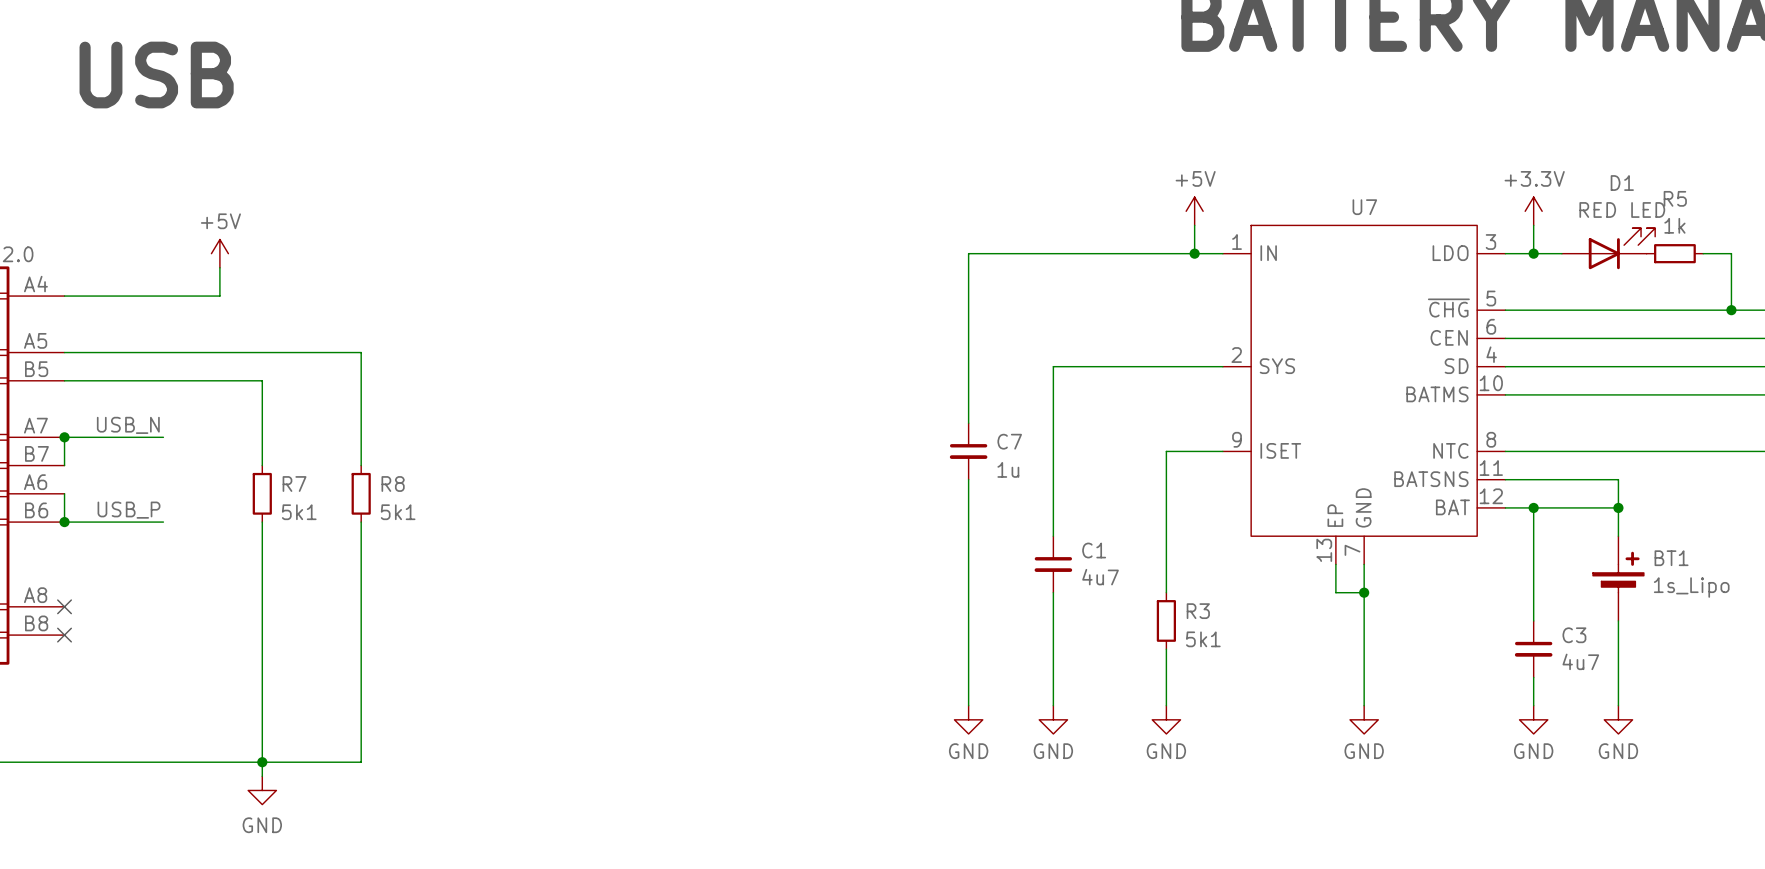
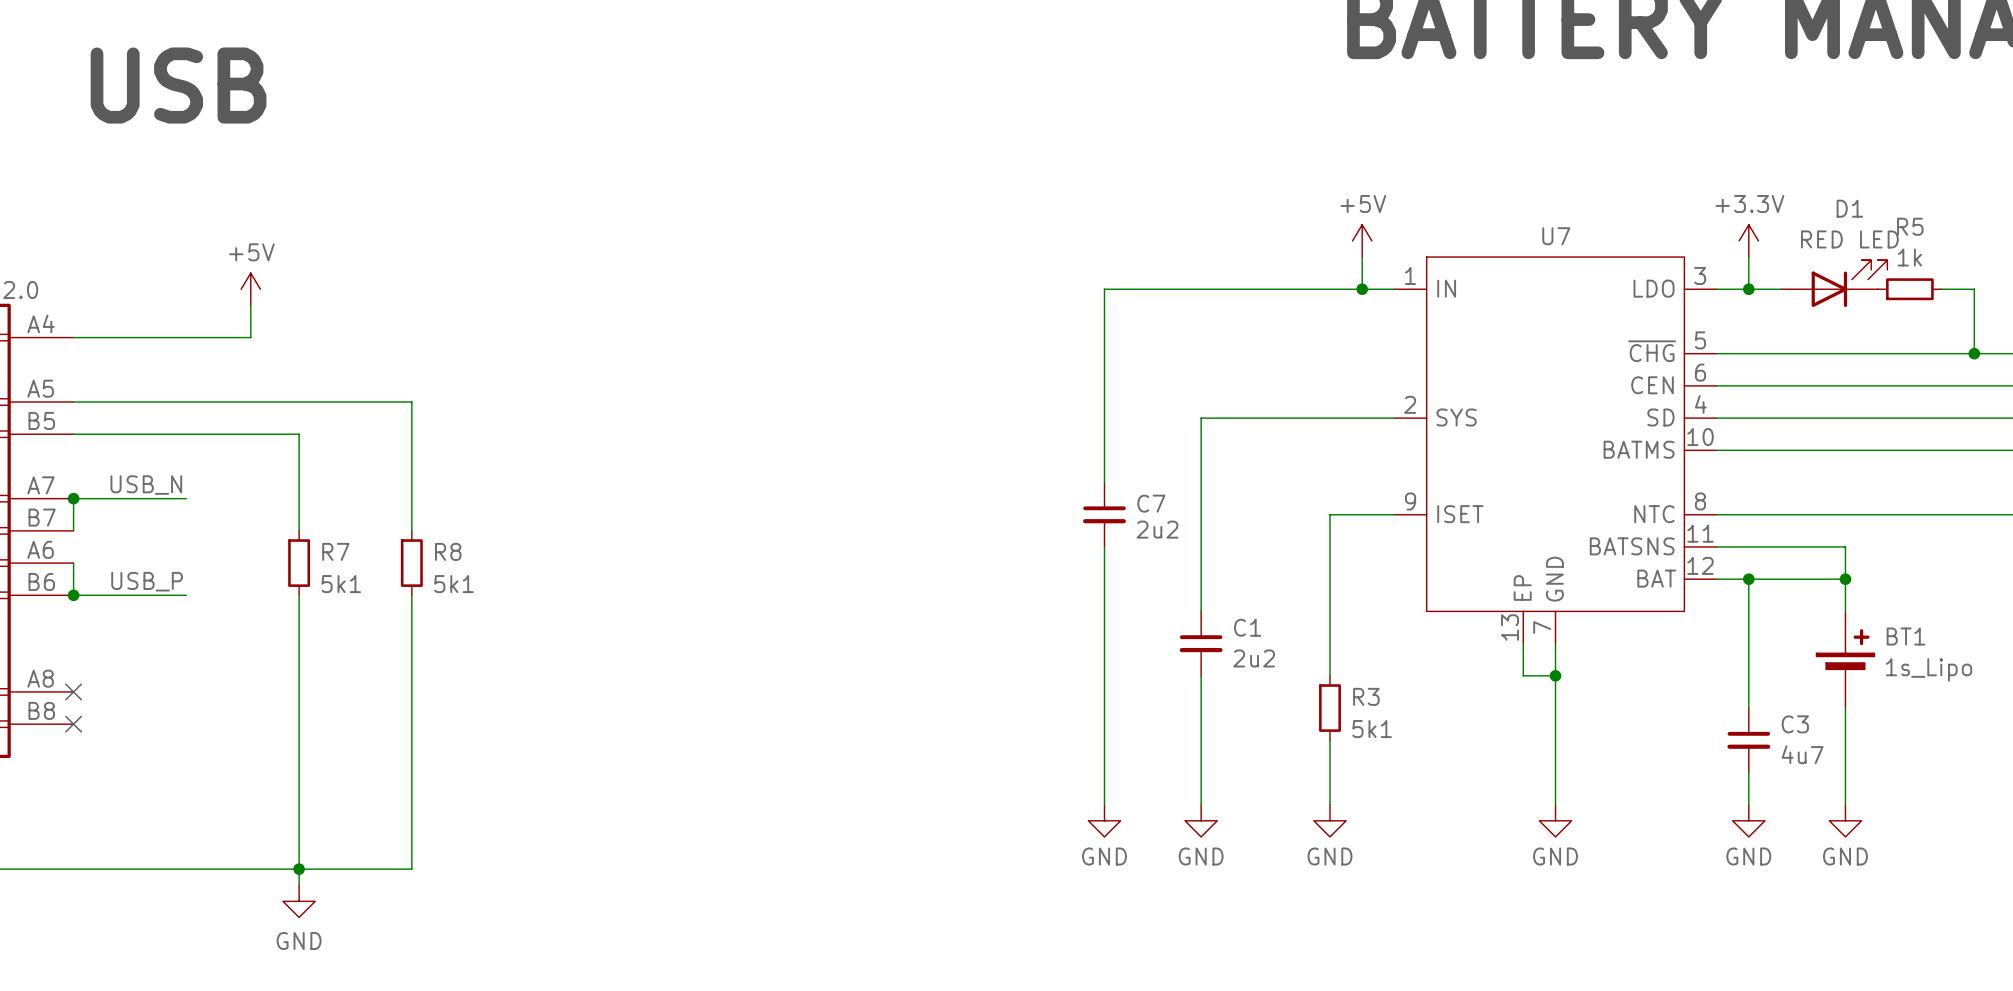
C7 value: 1u (1008, 469) -> 2u2 (1157, 529)
C1 value: 4u7 (1100, 577) -> 2u2 (1254, 658)

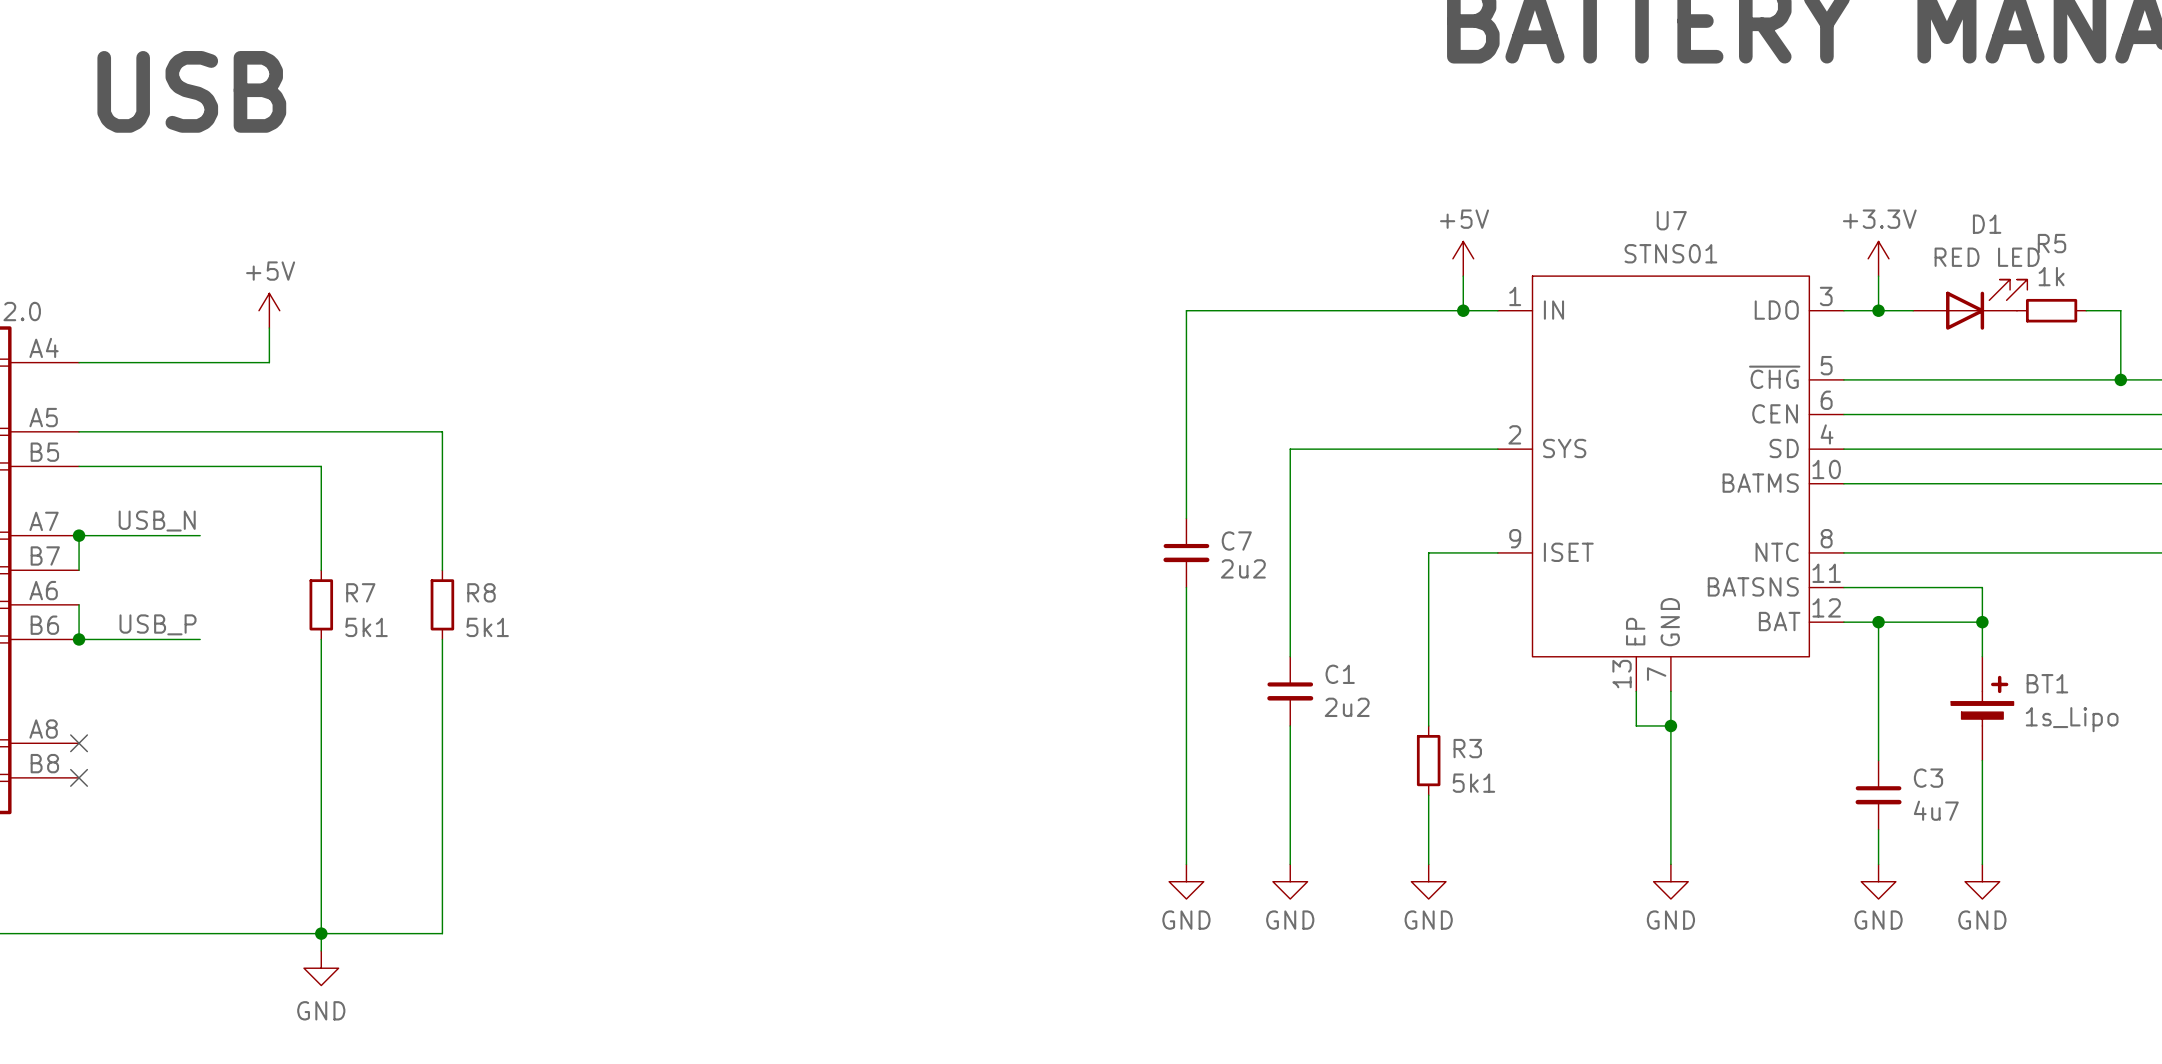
U7 value: none -> STNS01 (1670, 253)
U7 name position: U7 (1556, 236) -> U7 (1671, 220)

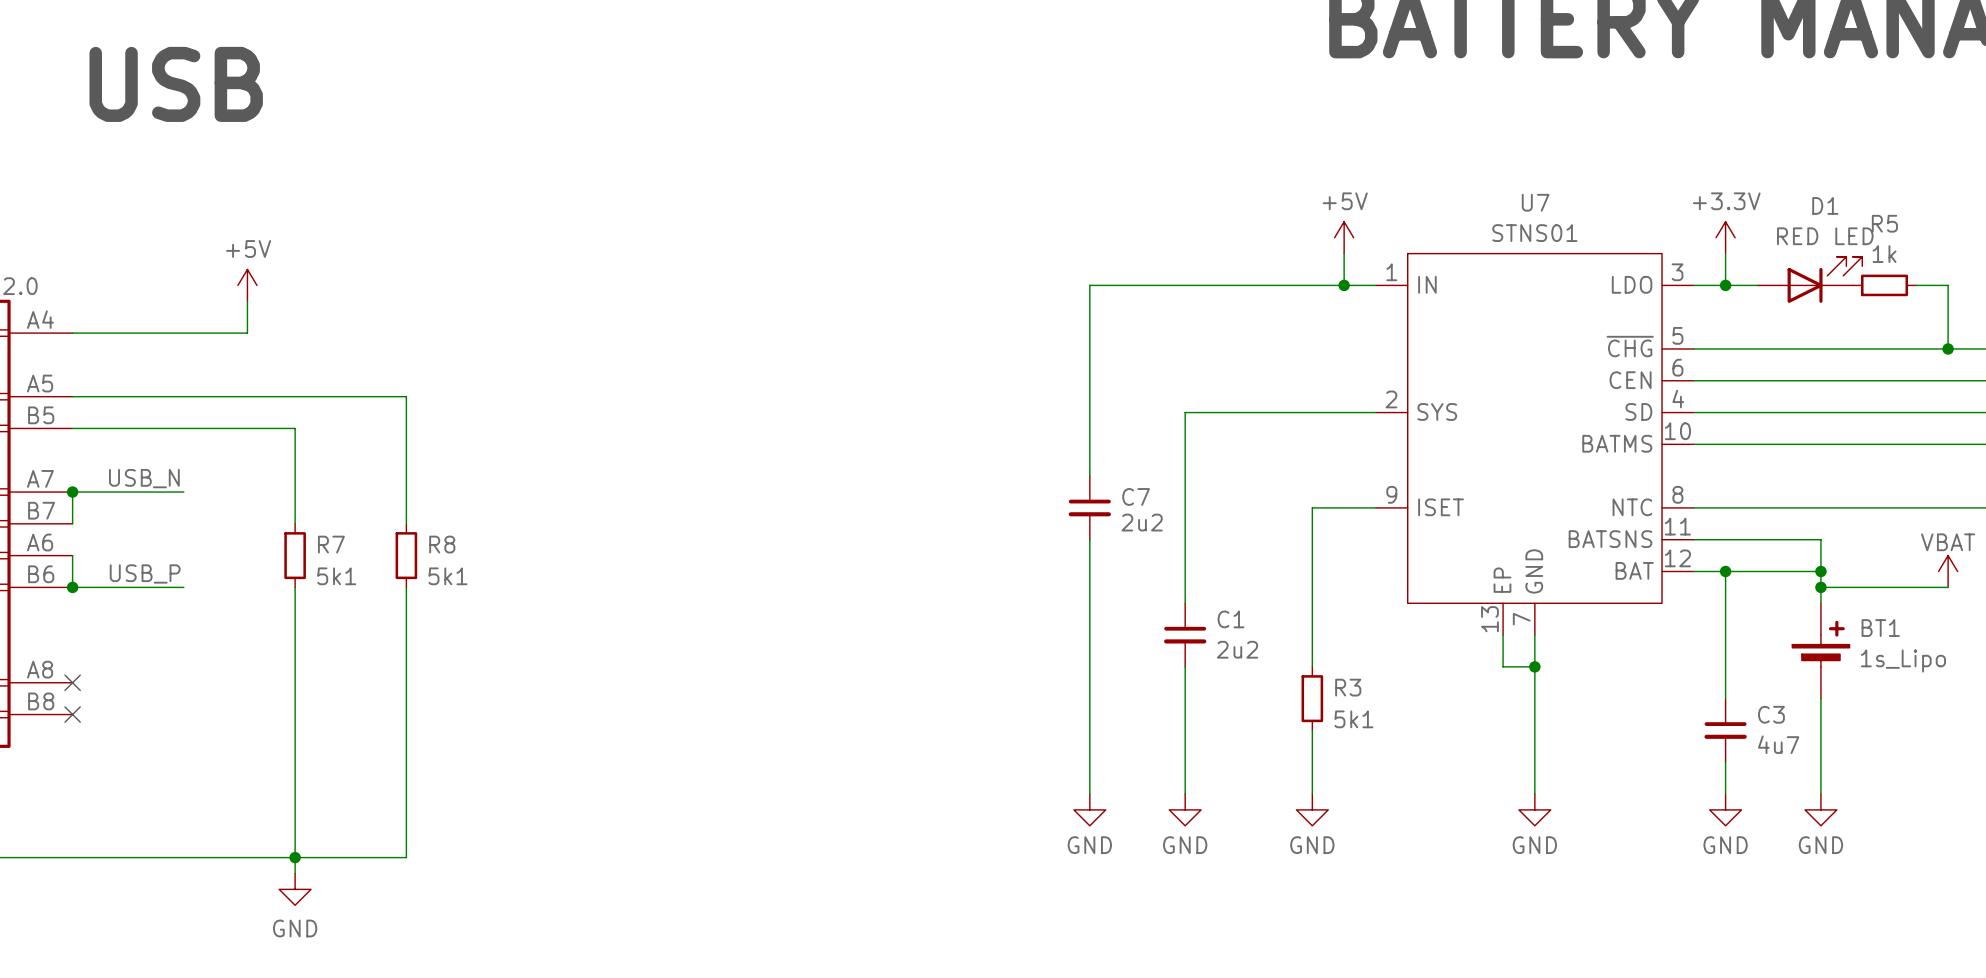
power symbol: none -> VBAT (1948, 571)
wire: none -> (1820, 587) (1948, 587)
junction: none -> (1820, 587)

